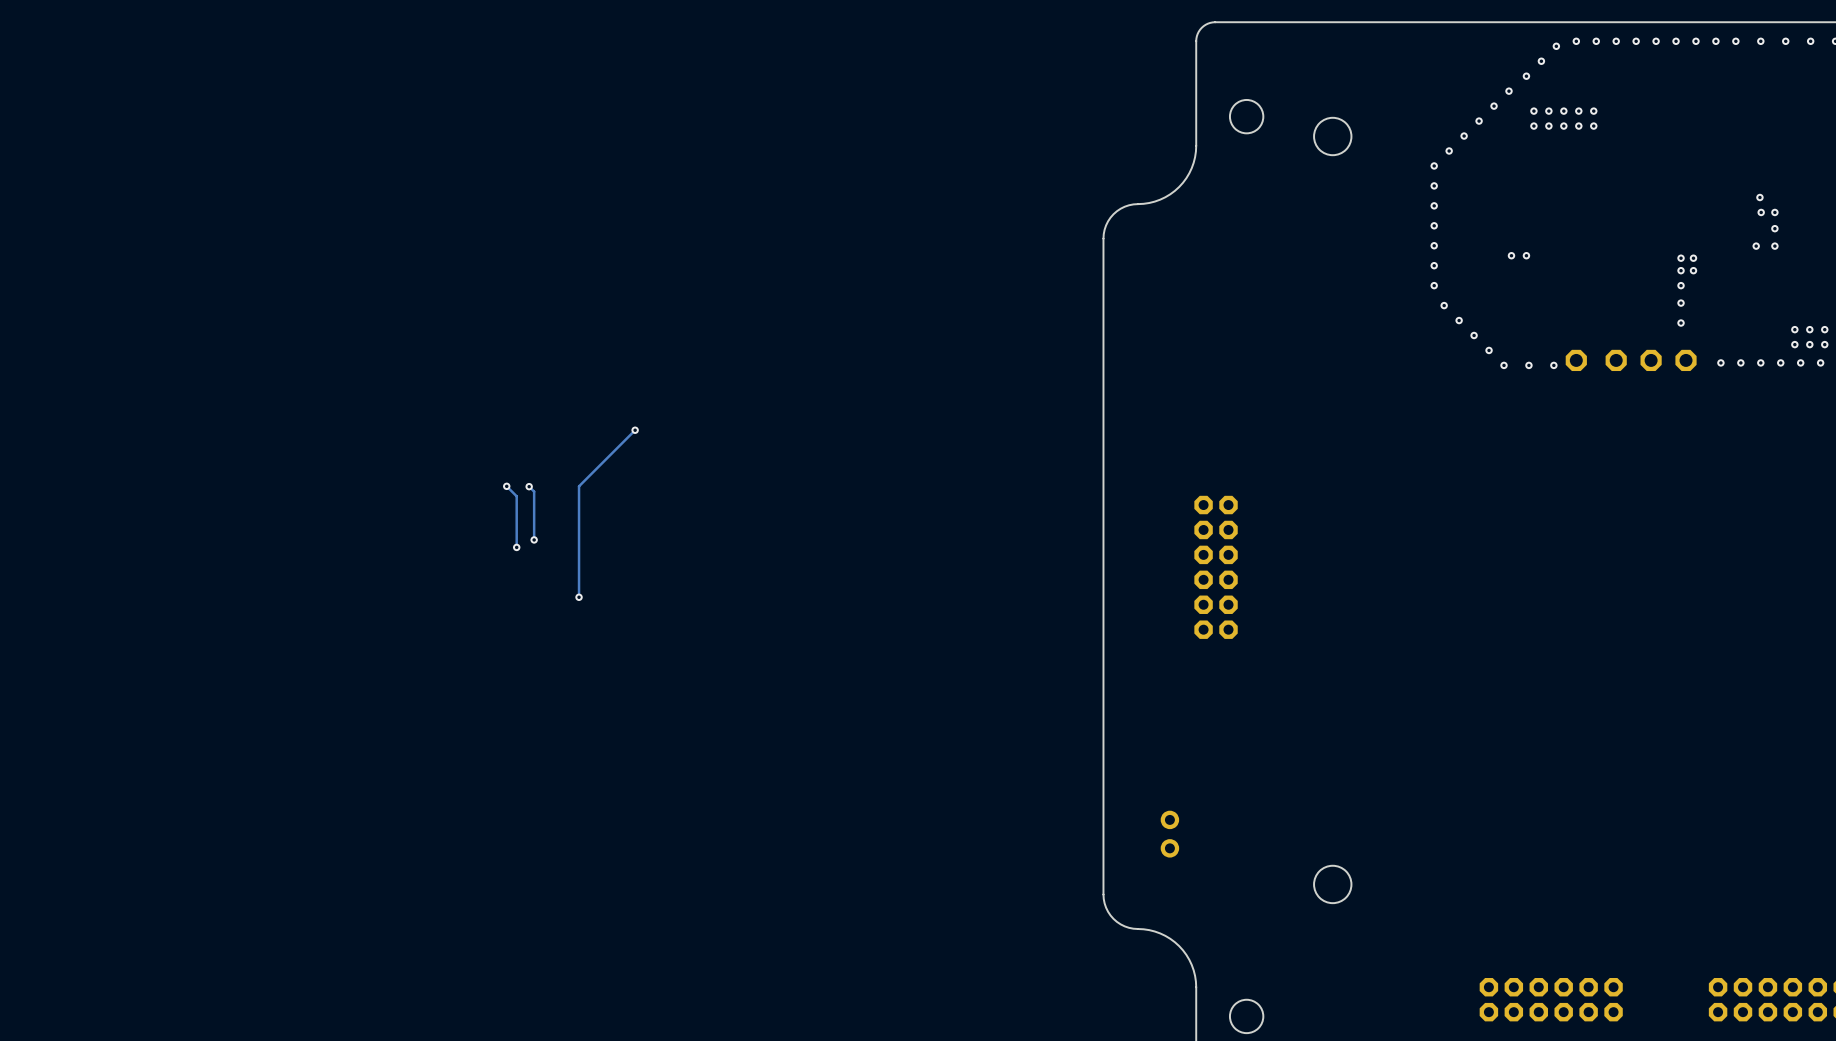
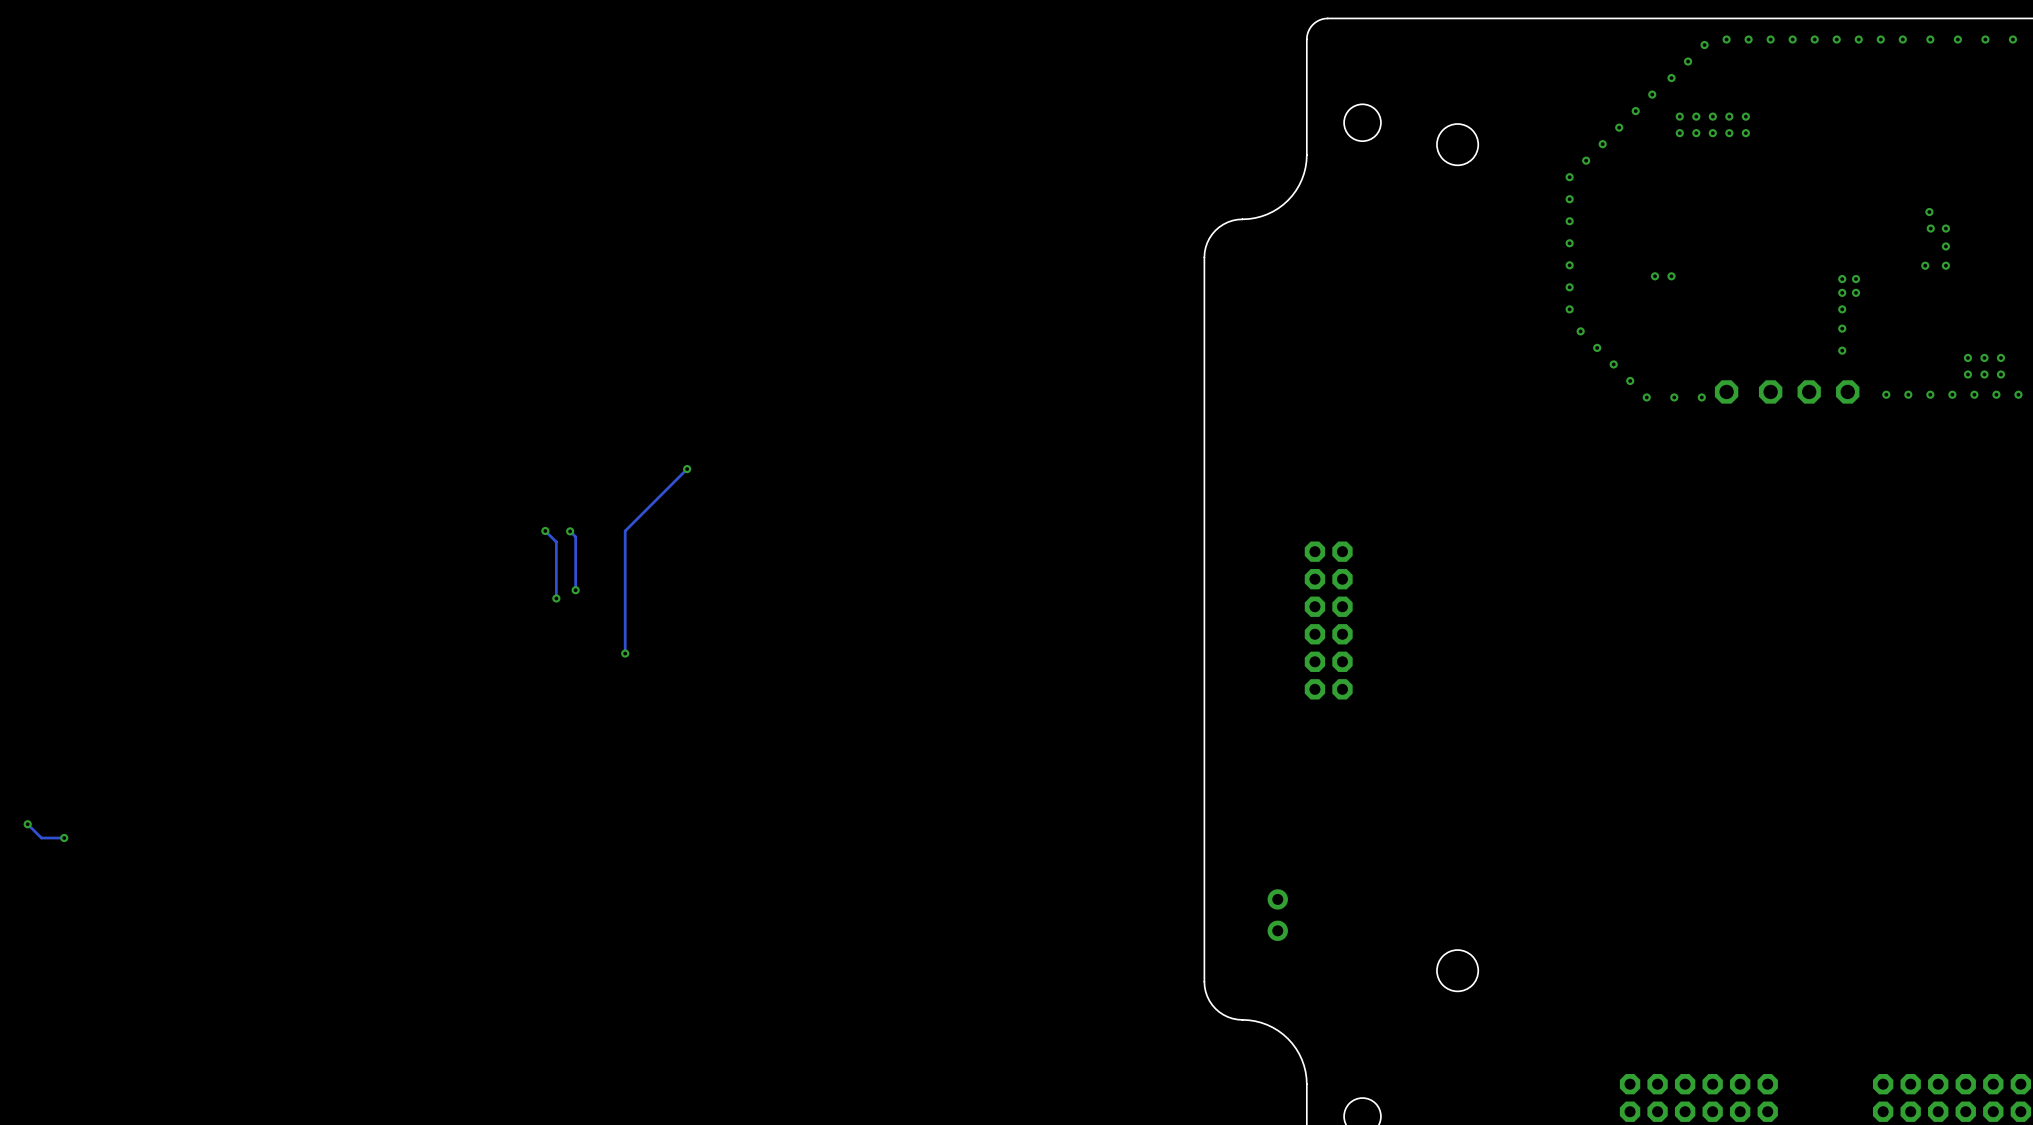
track: none -> (27, 824) (41, 838) (64, 838)
via: none -> (27, 824)
via: none -> (64, 838)

